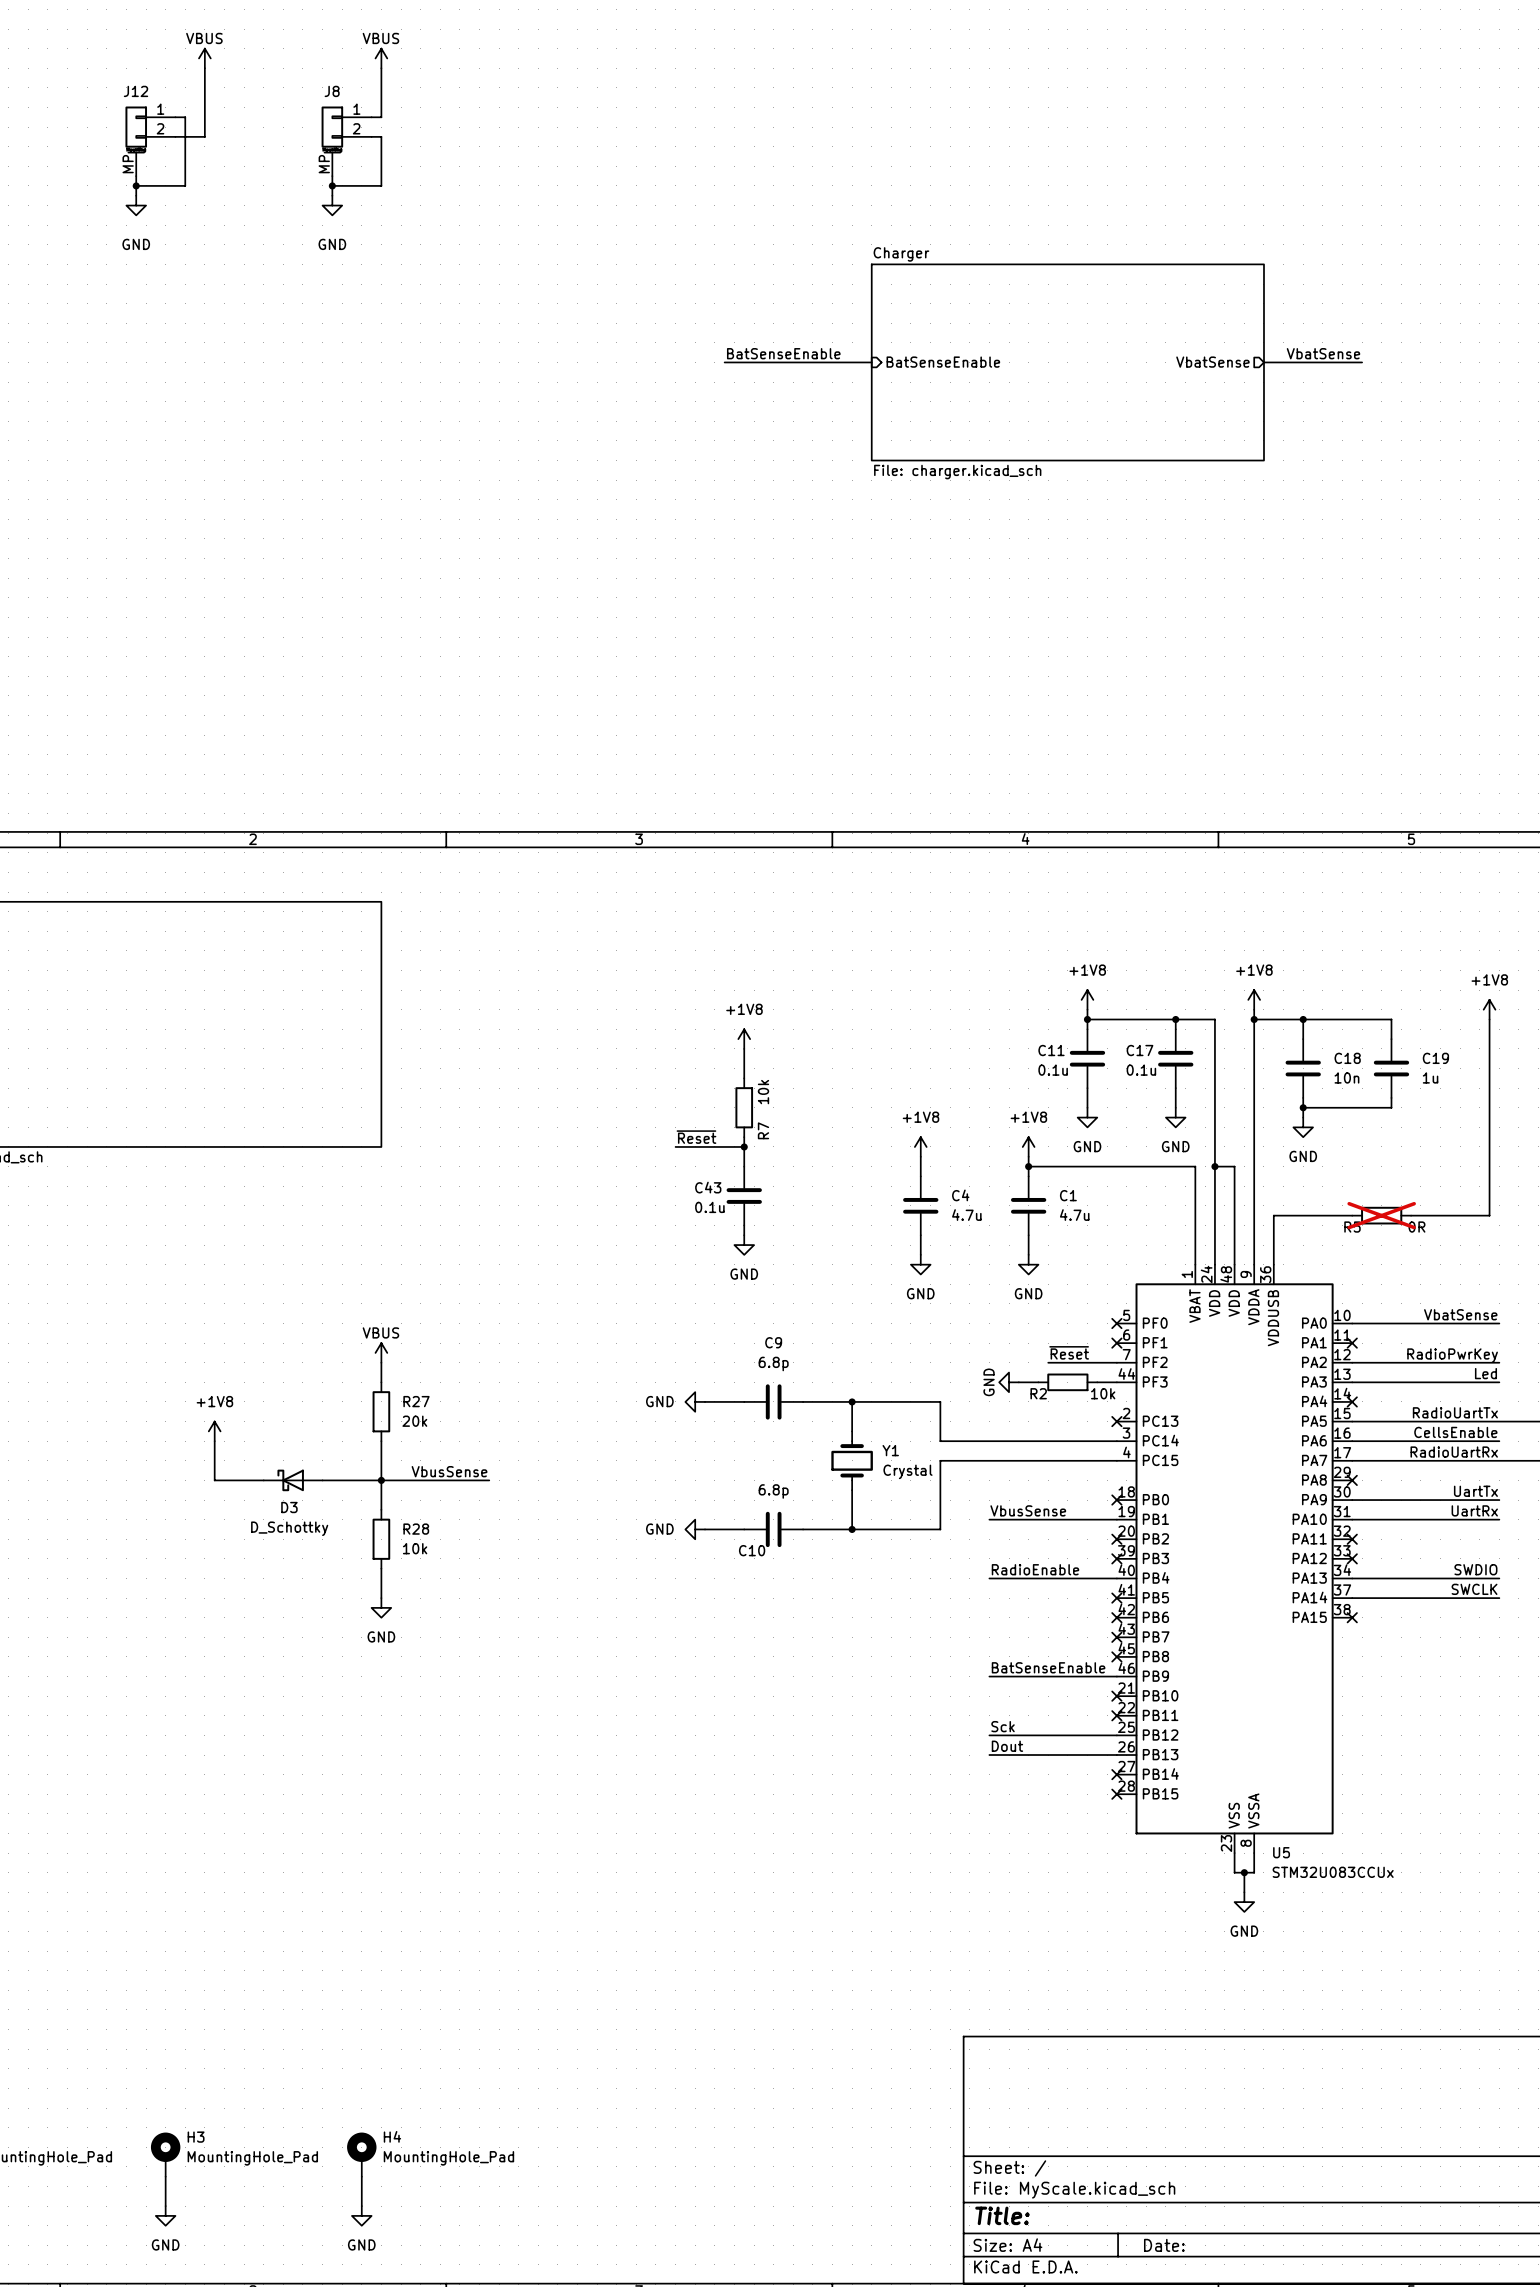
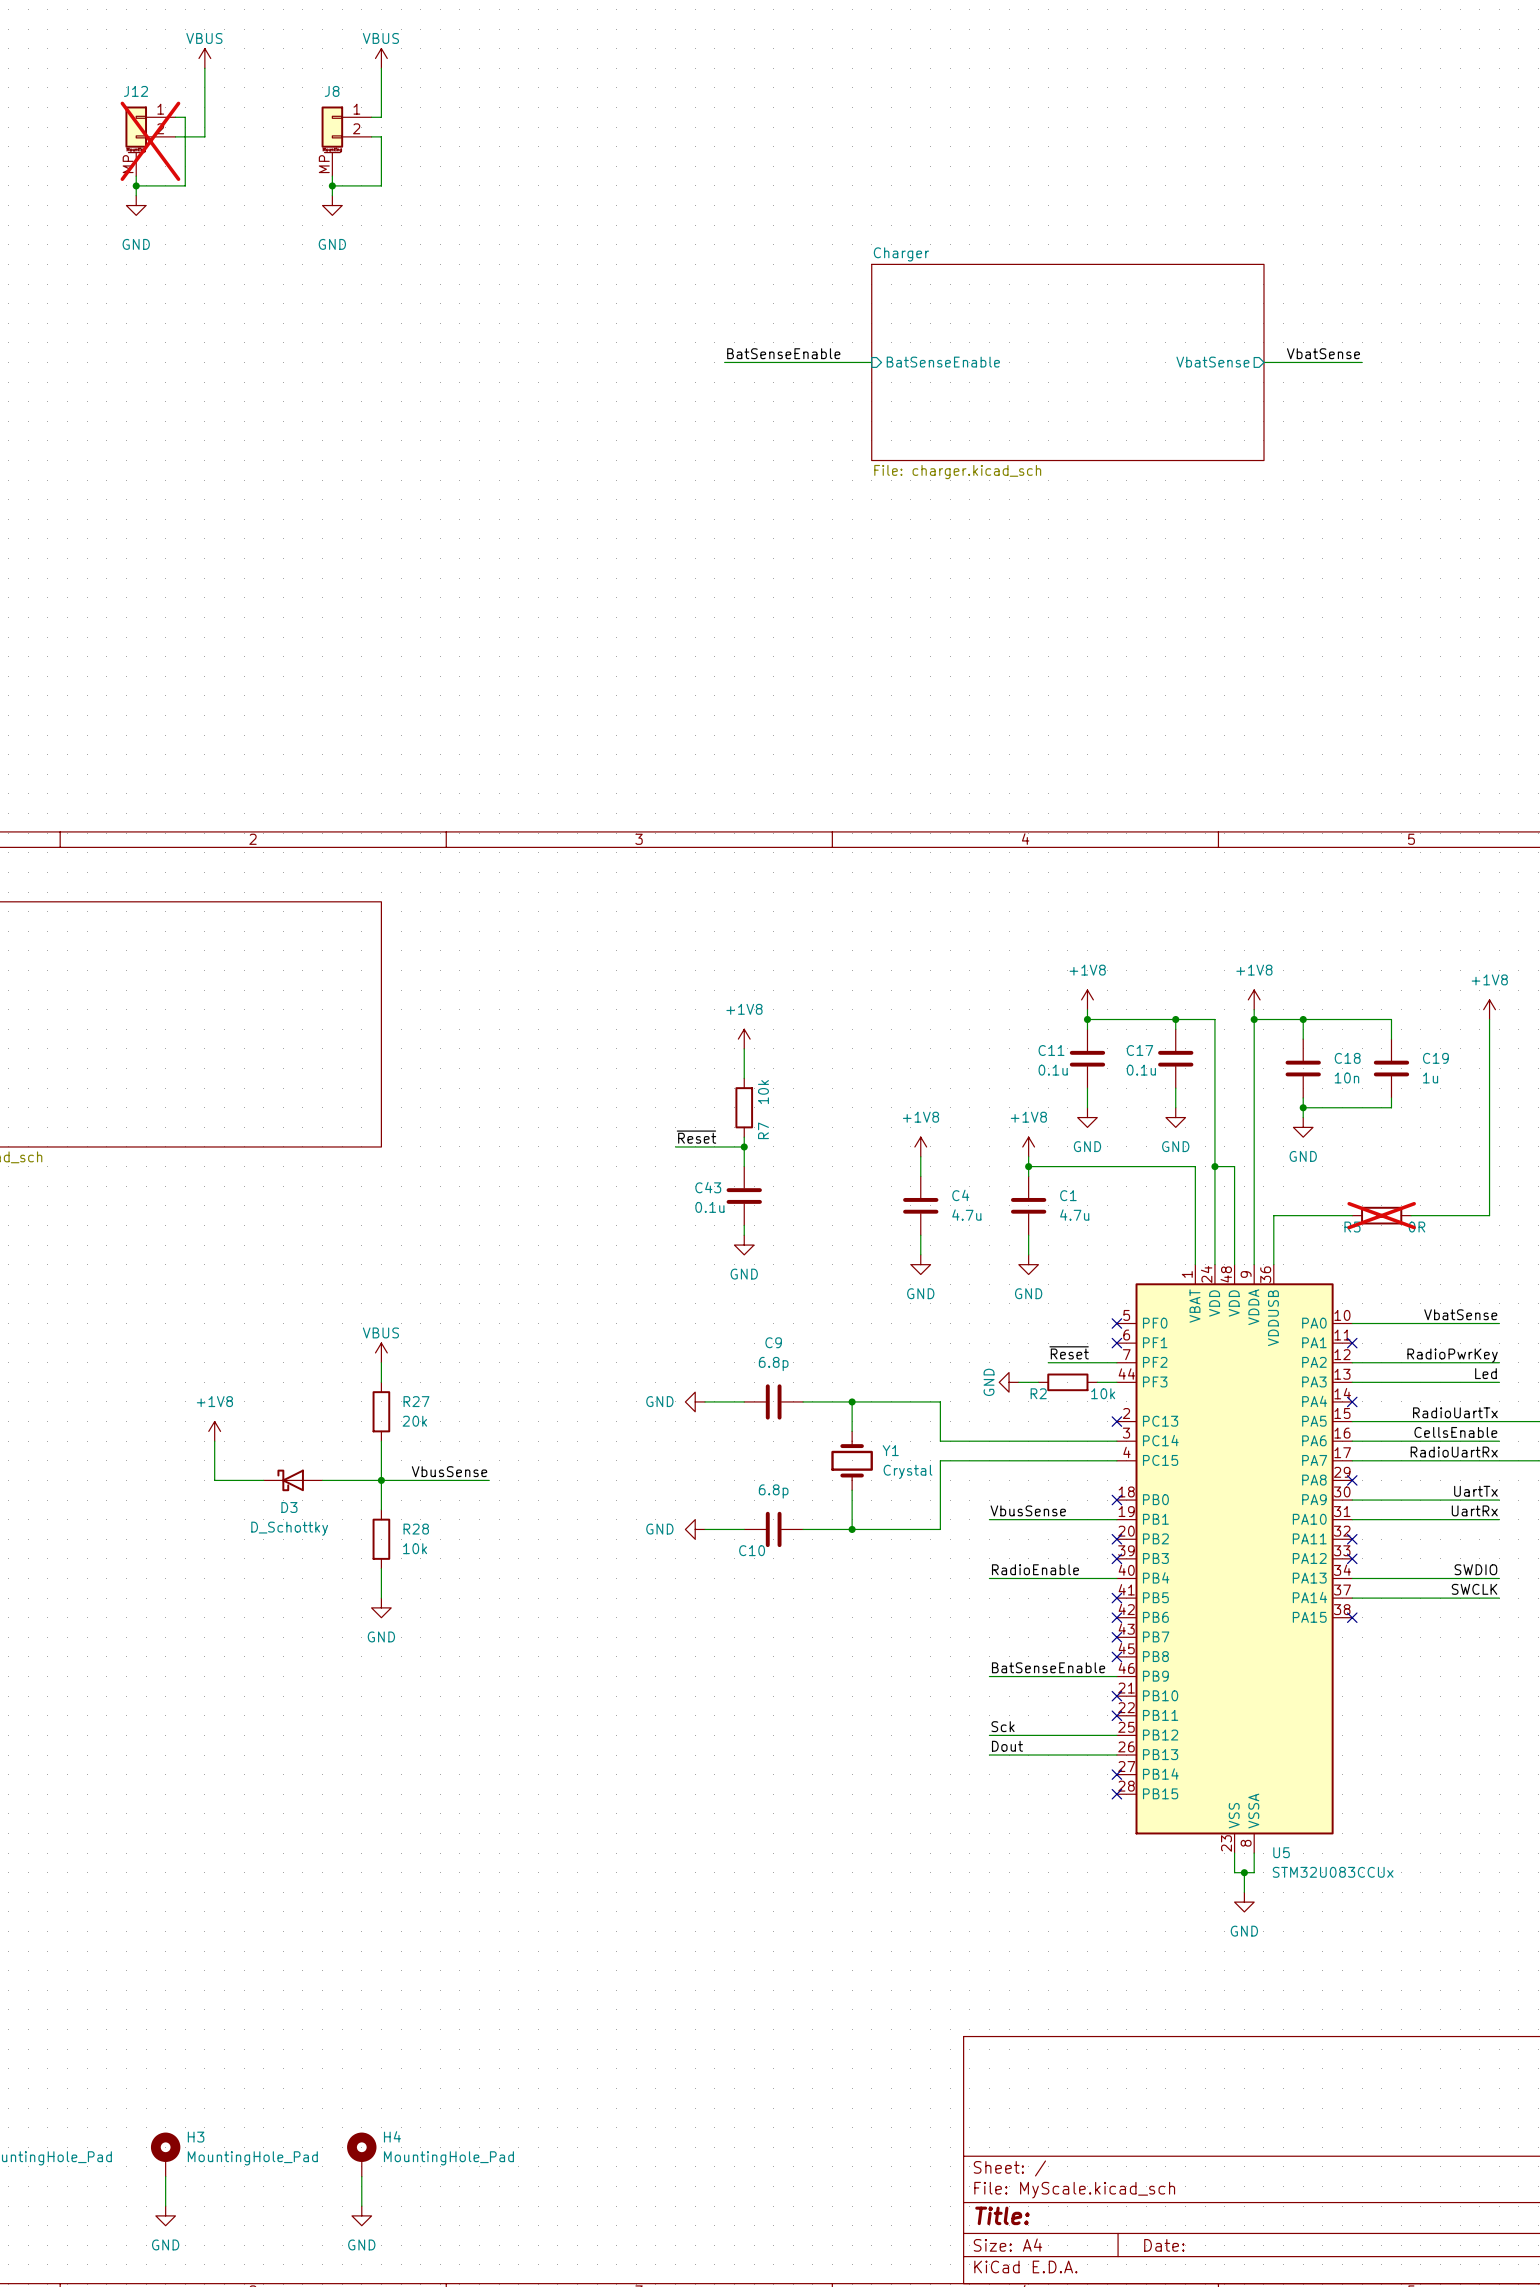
J12 do-not-place cross: none -> (150, 141)

